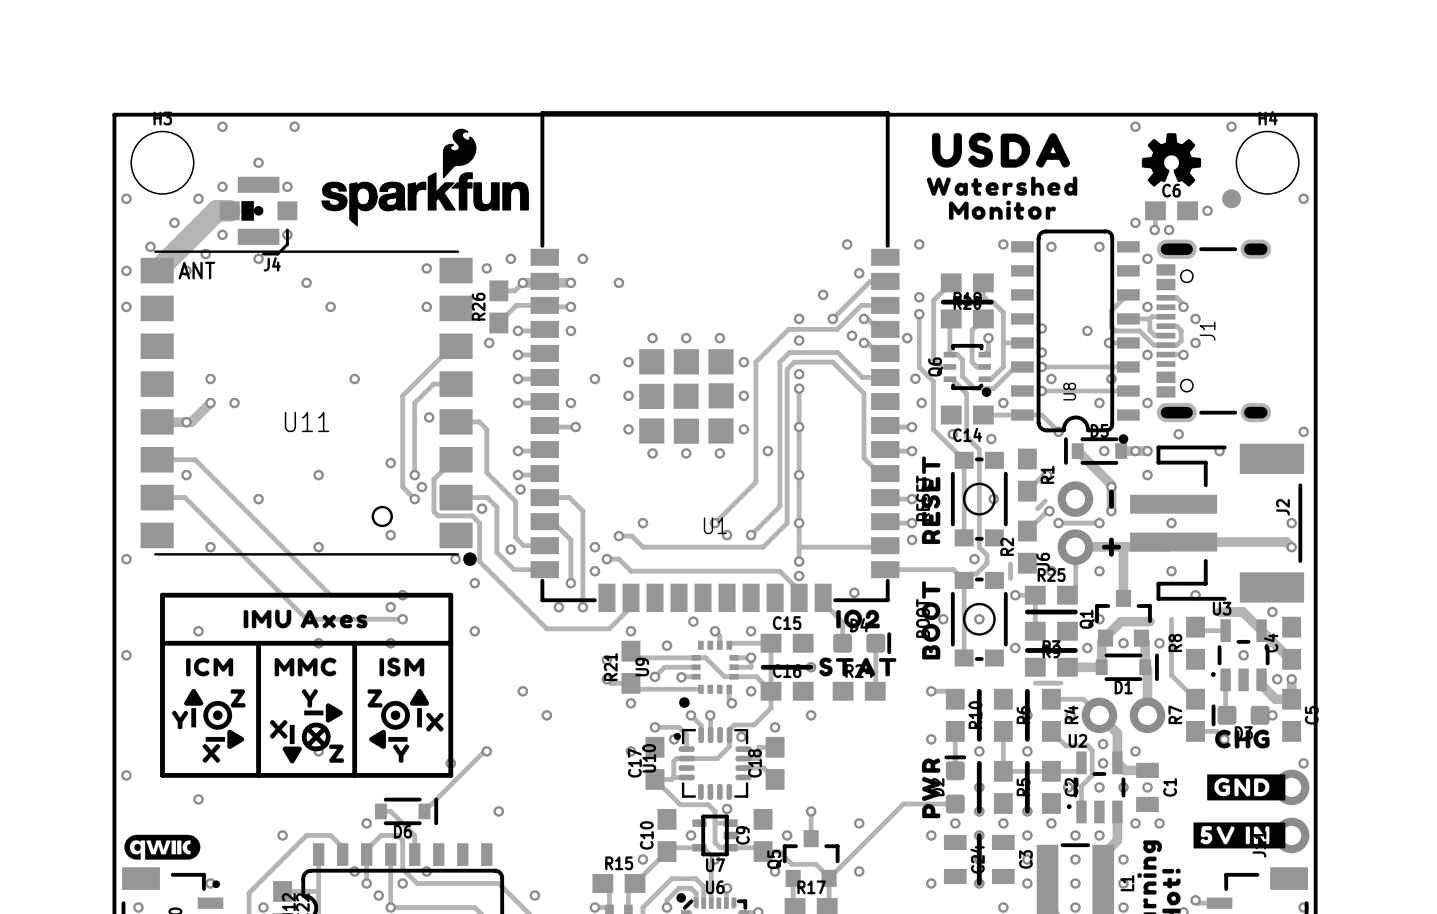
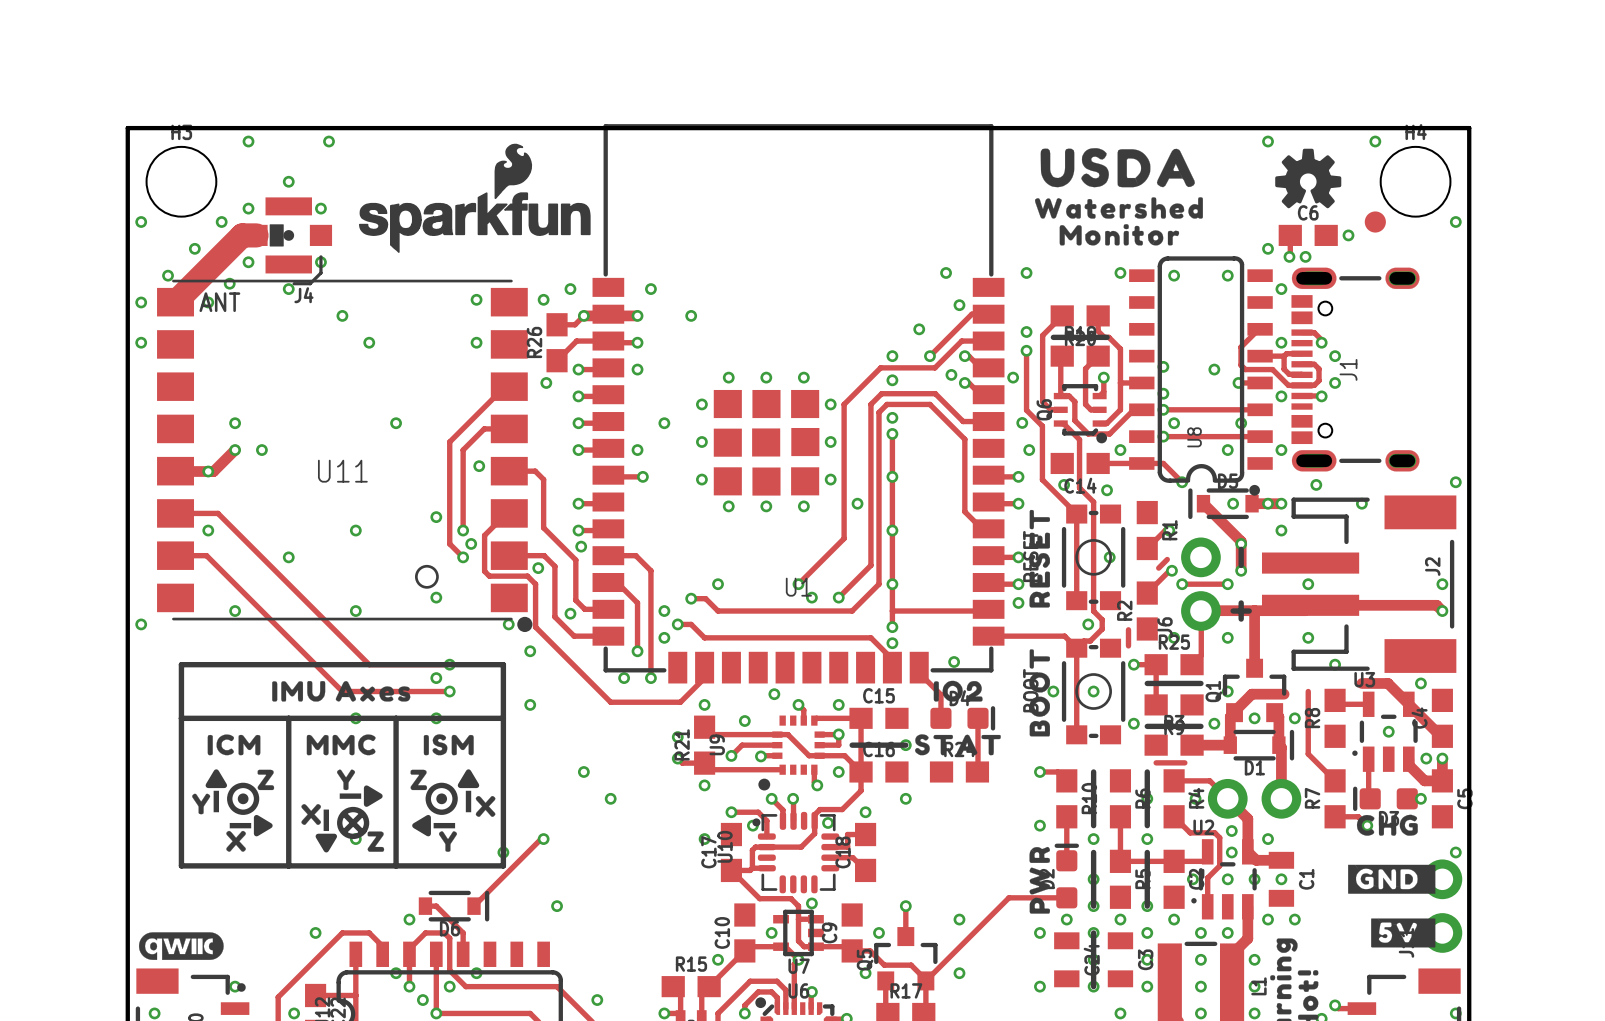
via: (198, 631) -> none
via: (126, 655) -> none
via: (126, 775) -> none
via: (198, 799) -> none
drawing shape: [1193, 822, 1286, 849] -> [1371, 918, 1436, 948]

